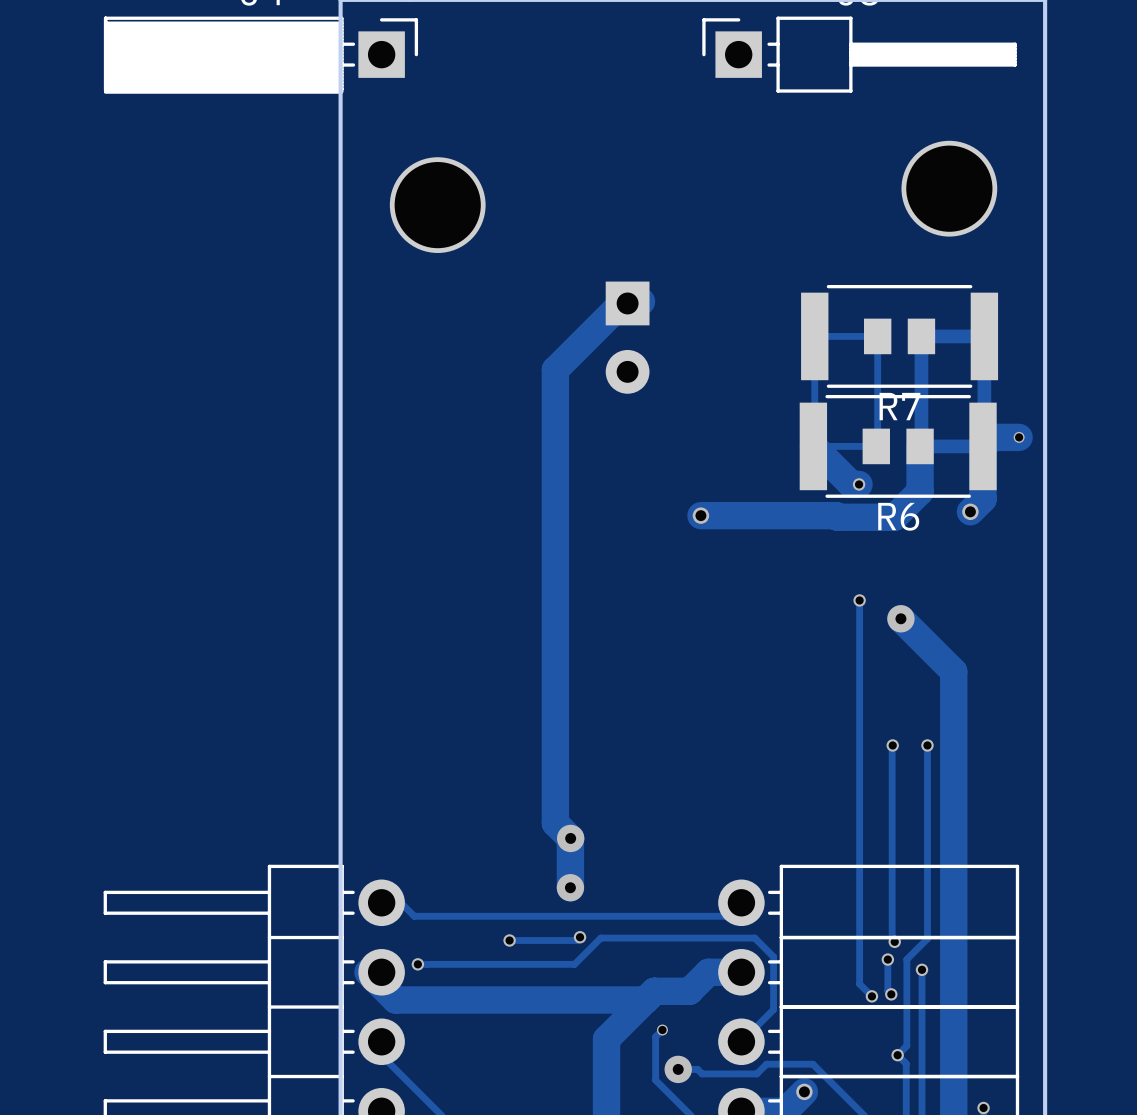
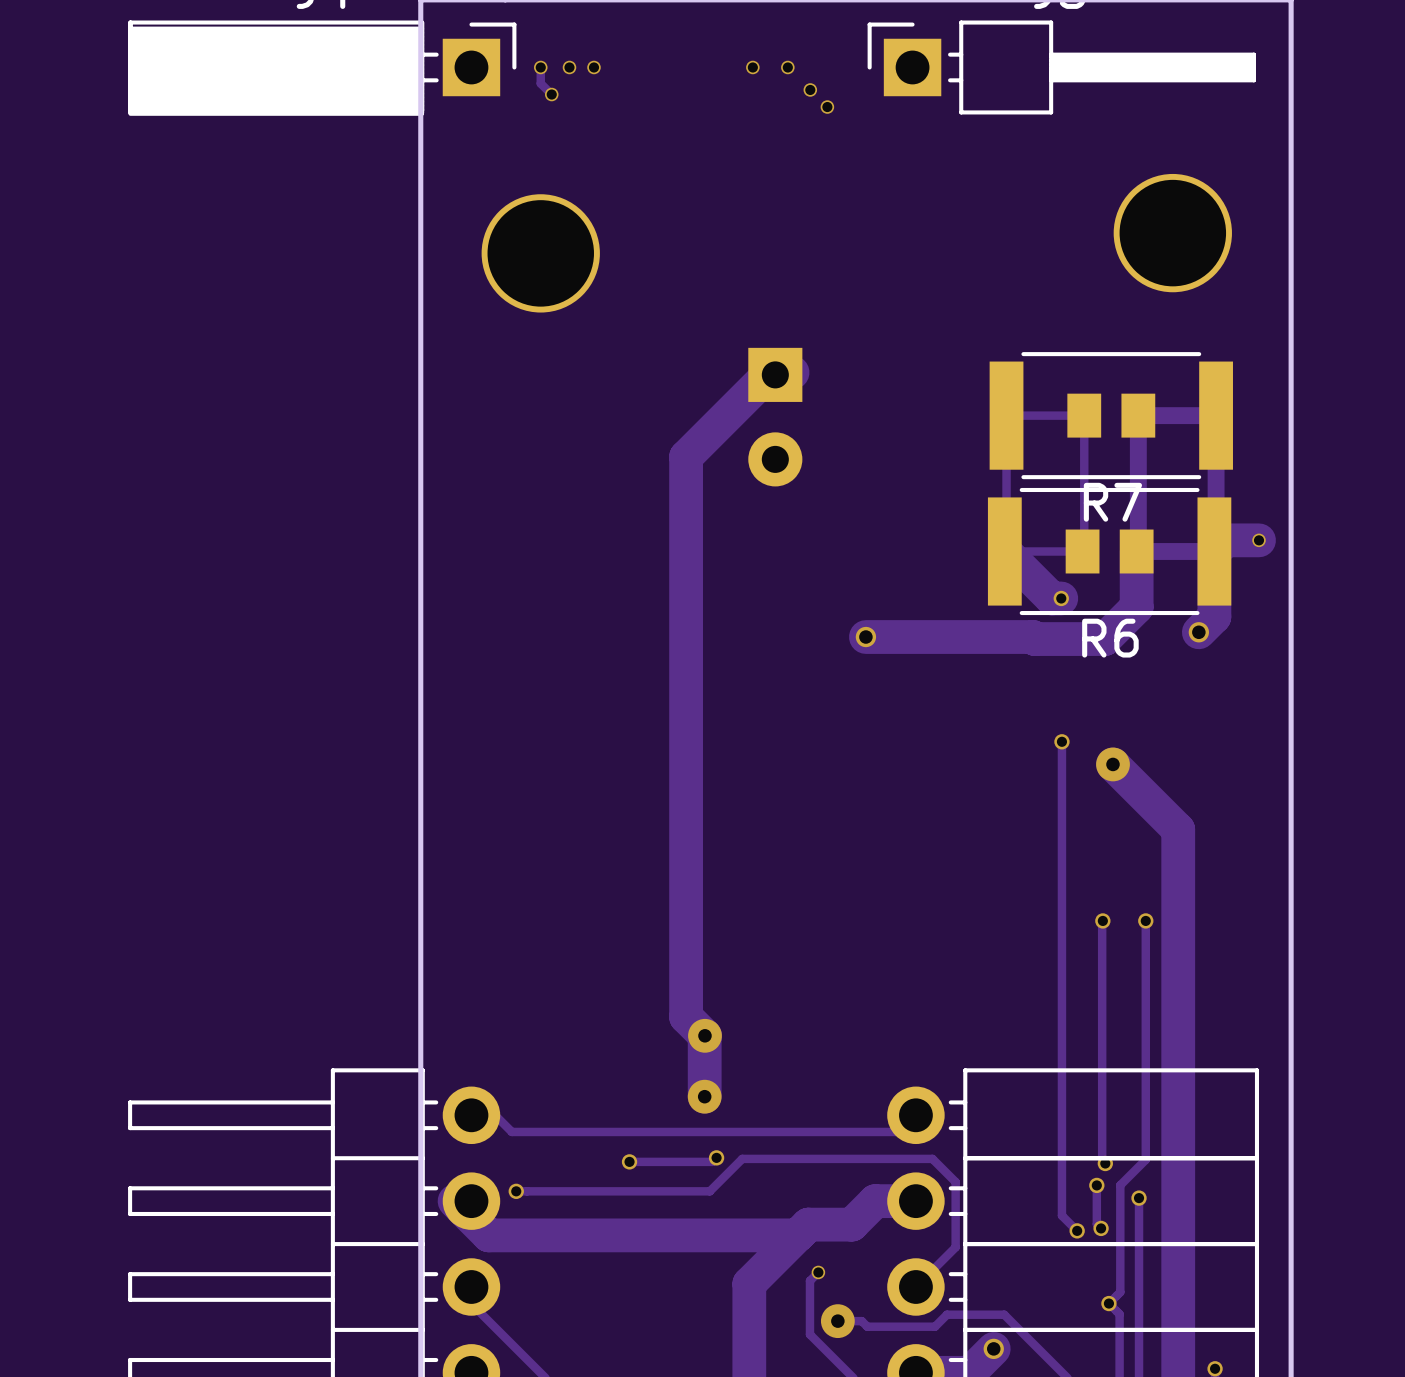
track: none -> (540, 67) (540, 83) (551, 94)
via: none -> (540, 67)
via: none -> (569, 67)
via: none -> (593, 67)
via: none -> (752, 67)
via: none -> (787, 67)
via: none -> (810, 89)
via: none -> (551, 94)
via: none -> (827, 107)

